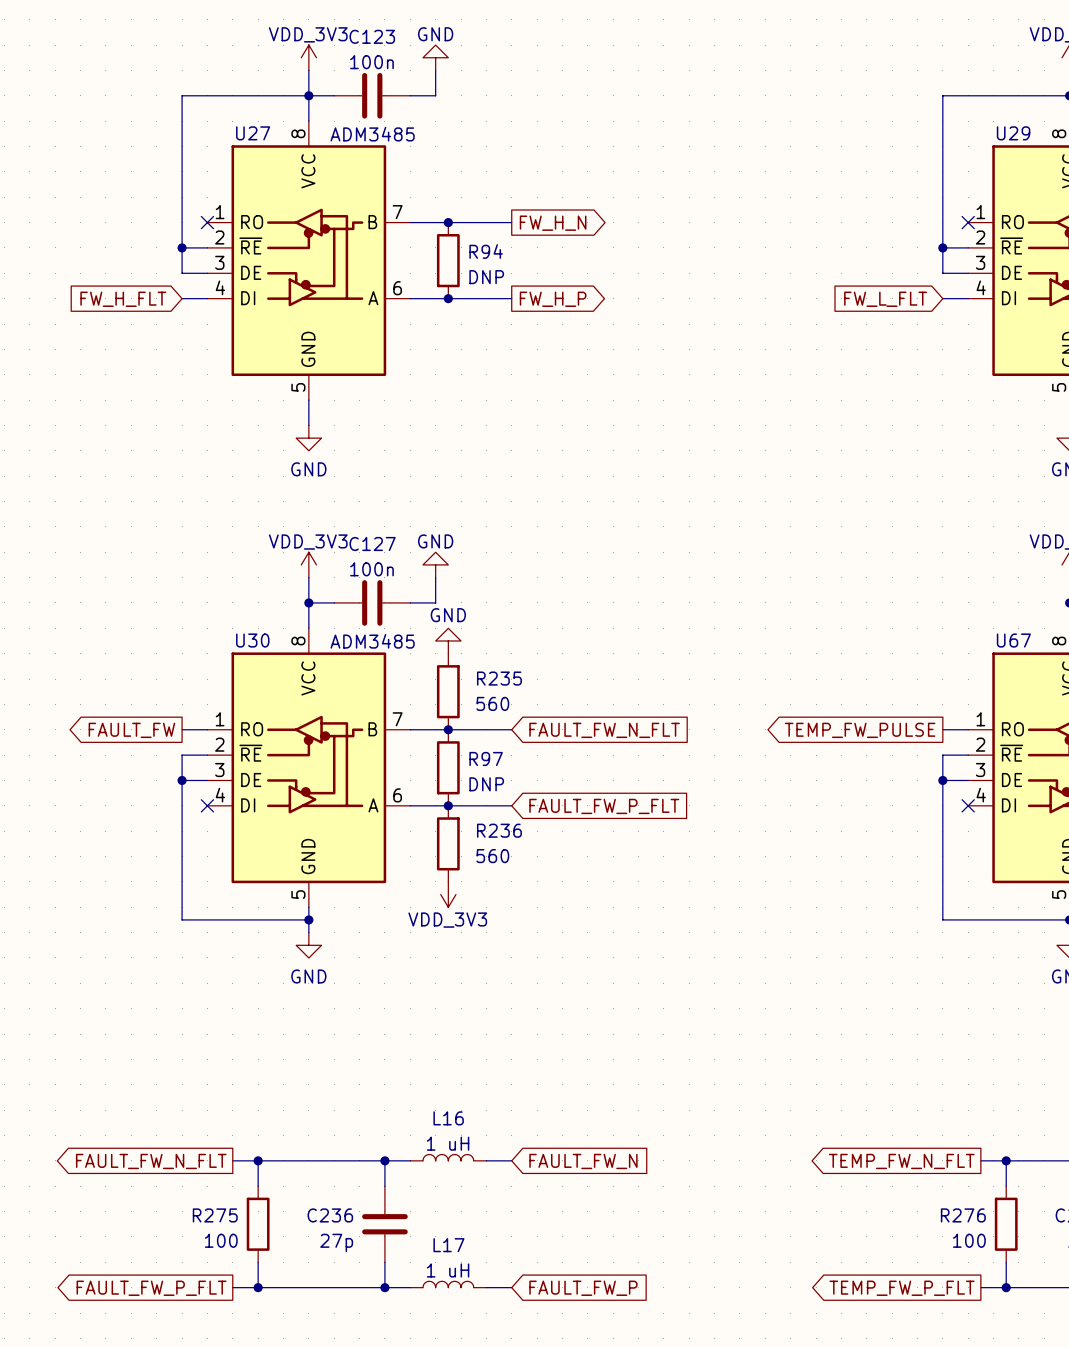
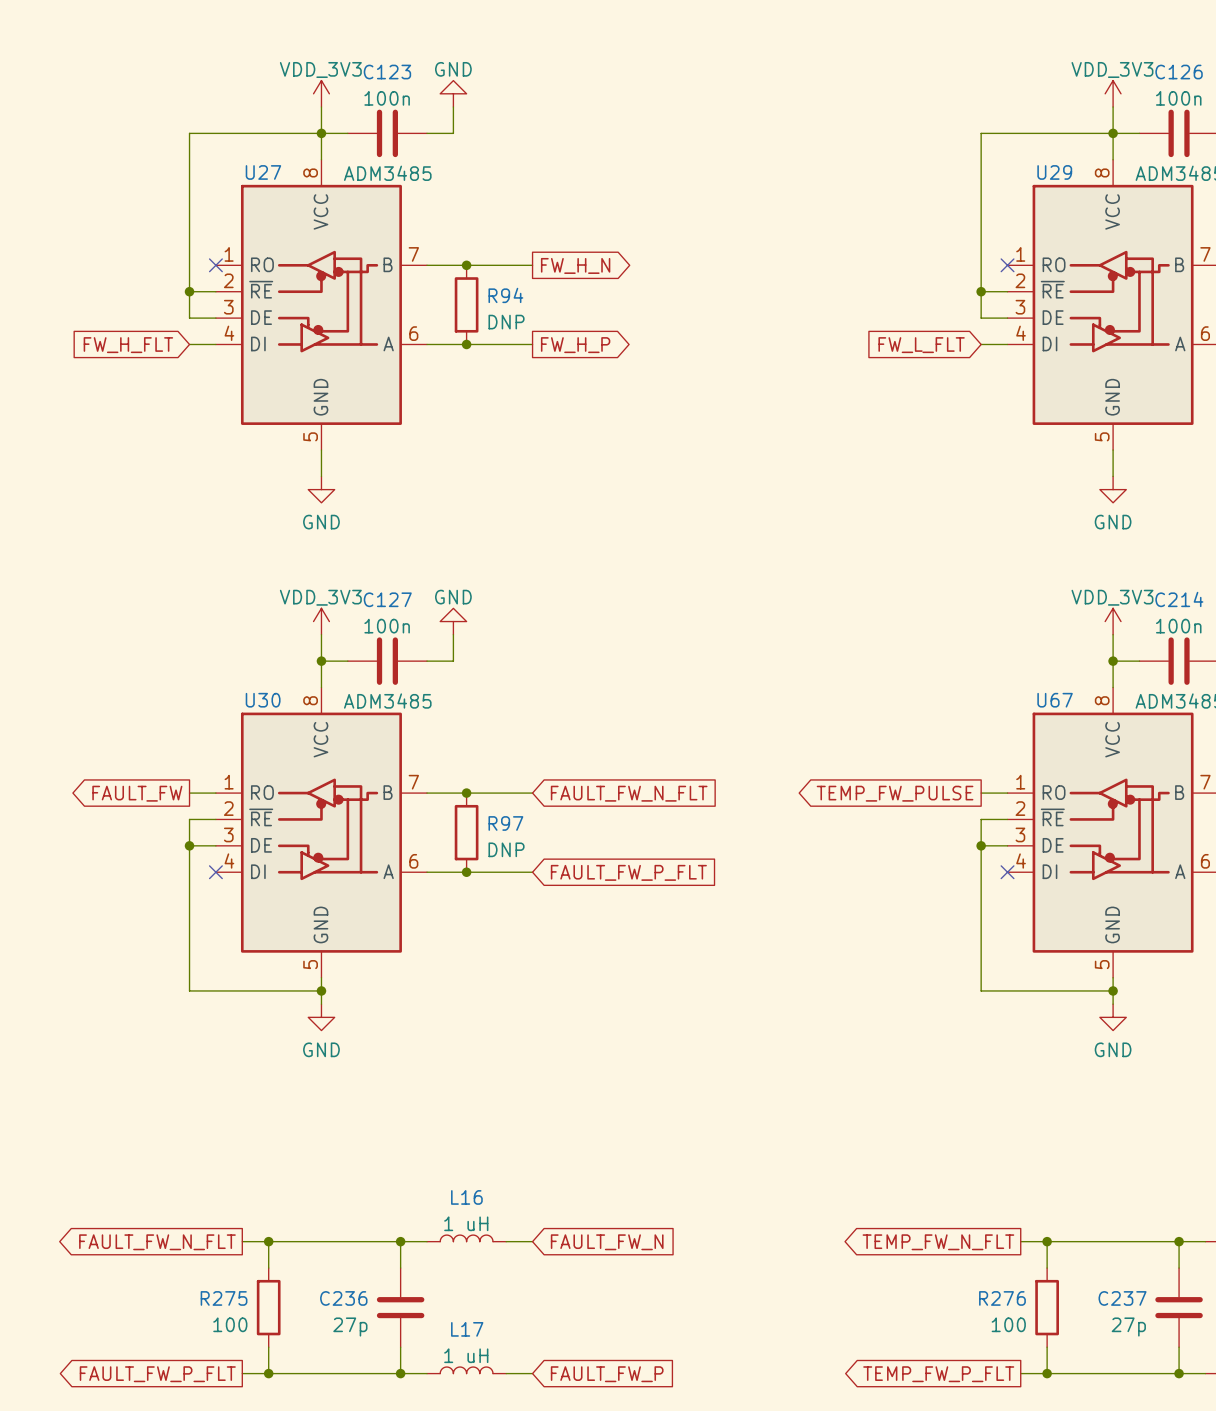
power symbol: GND (448, 641) -> none
R235: 560 (448, 691) -> none
R236: 560 (448, 843) -> none
power symbol: VDD_3V3 (448, 894) -> none

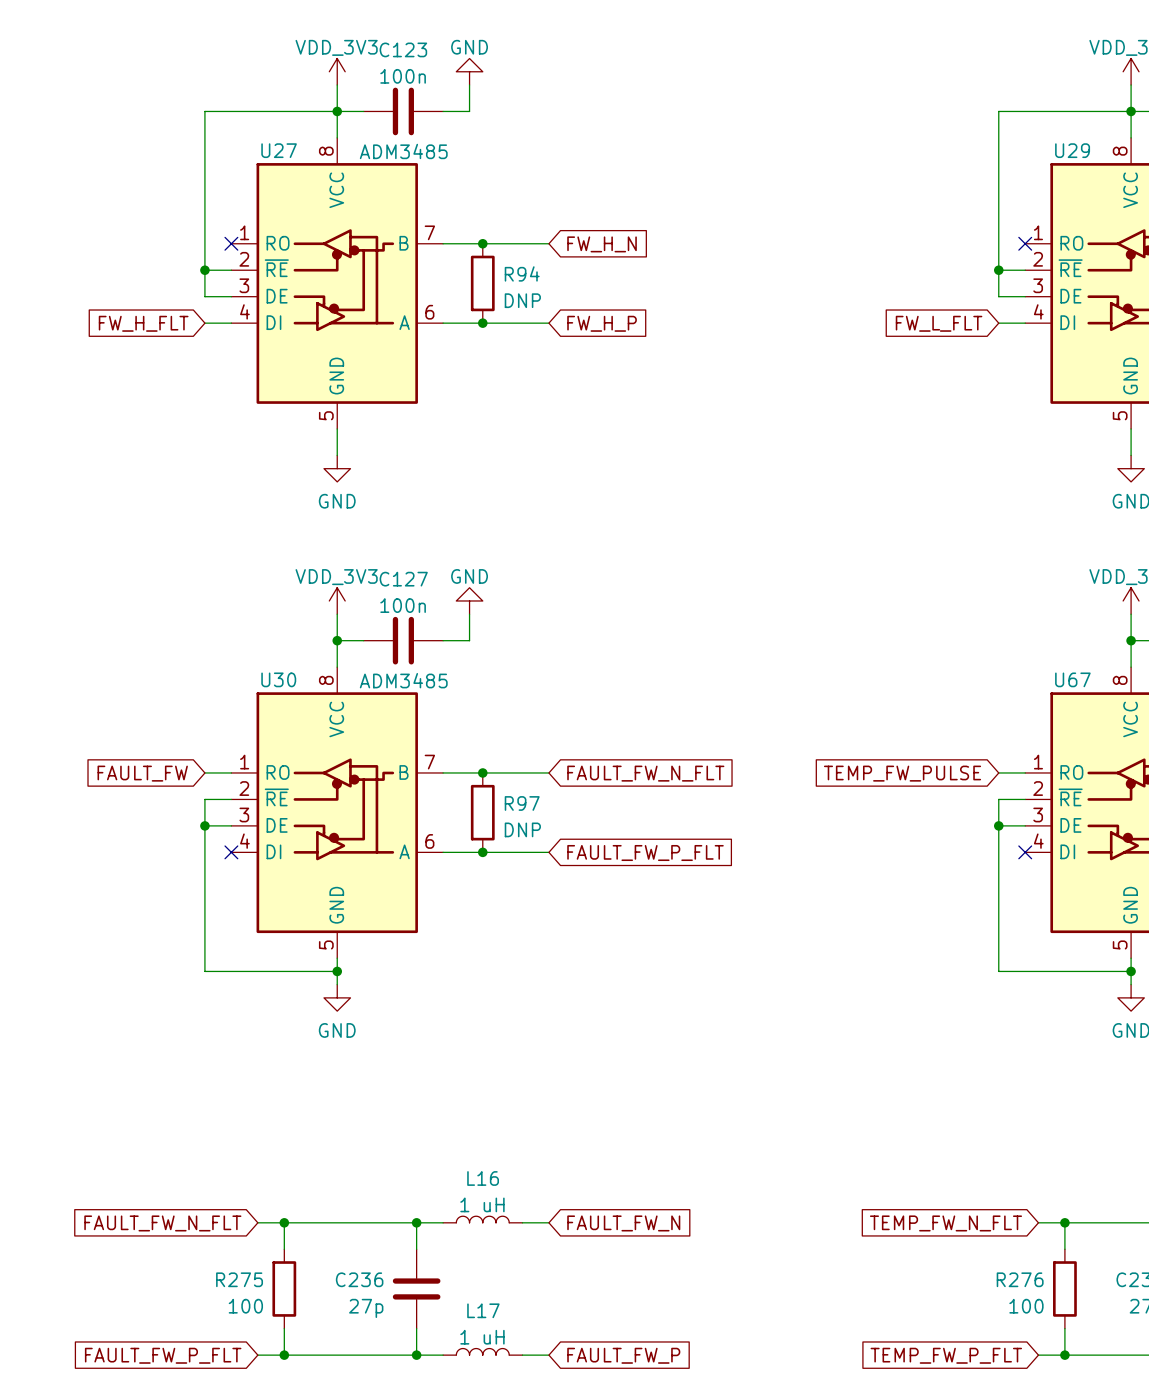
global label shape: output (575, 265) -> input (602, 244)
global label shape: output (575, 345) -> input (602, 323)
global label shape: output (137, 793) -> input (142, 773)
global label shape: output (895, 793) -> input (902, 773)
global label shape: output (157, 1242) -> input (162, 1223)
global label shape: output (938, 1242) -> input (945, 1223)
global label shape: output (157, 1374) -> input (163, 1355)
global label shape: output (938, 1374) -> input (946, 1355)

